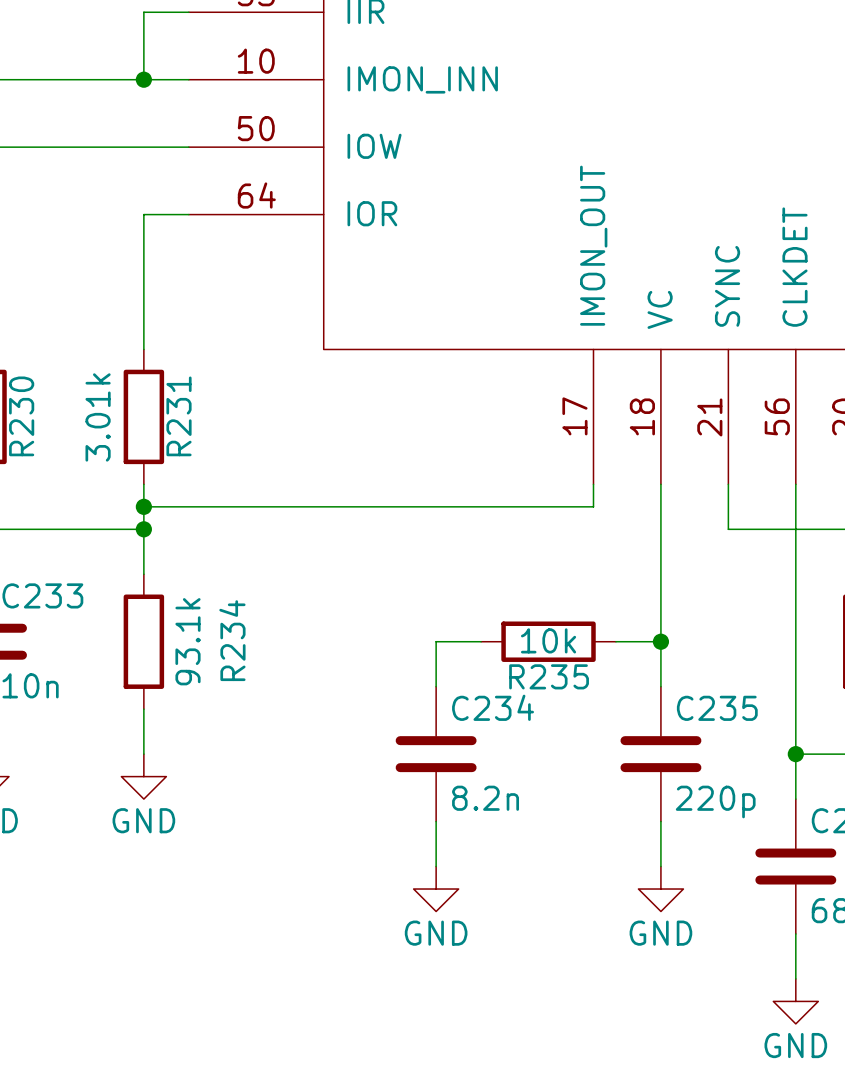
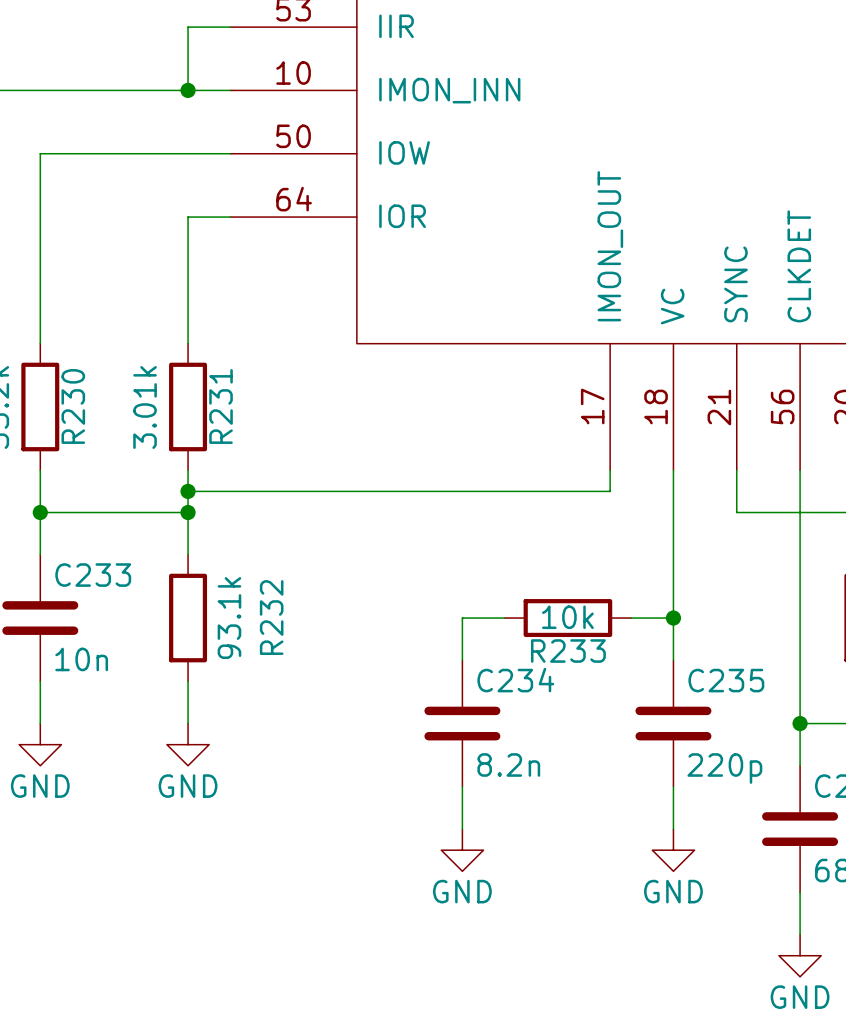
R234 name: R234 (232, 640) -> R232 (271, 617)
R235 name: R235 (549, 676) -> R233 (568, 651)

